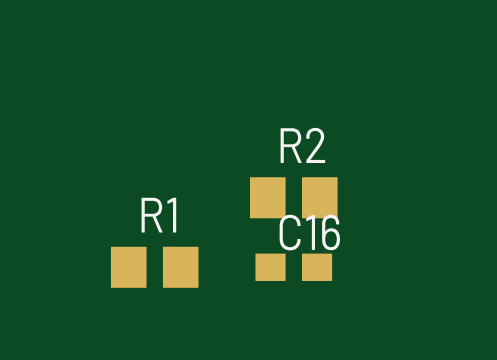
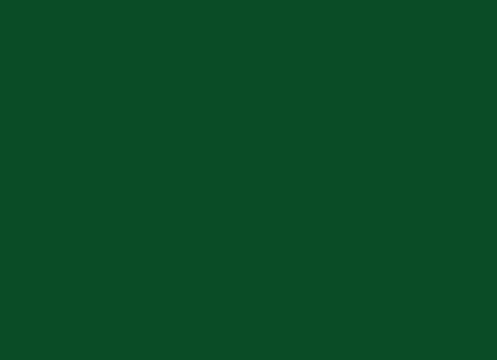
R2: (293, 197) -> none
R1: (154, 267) -> none
C16: (293, 267) -> none

